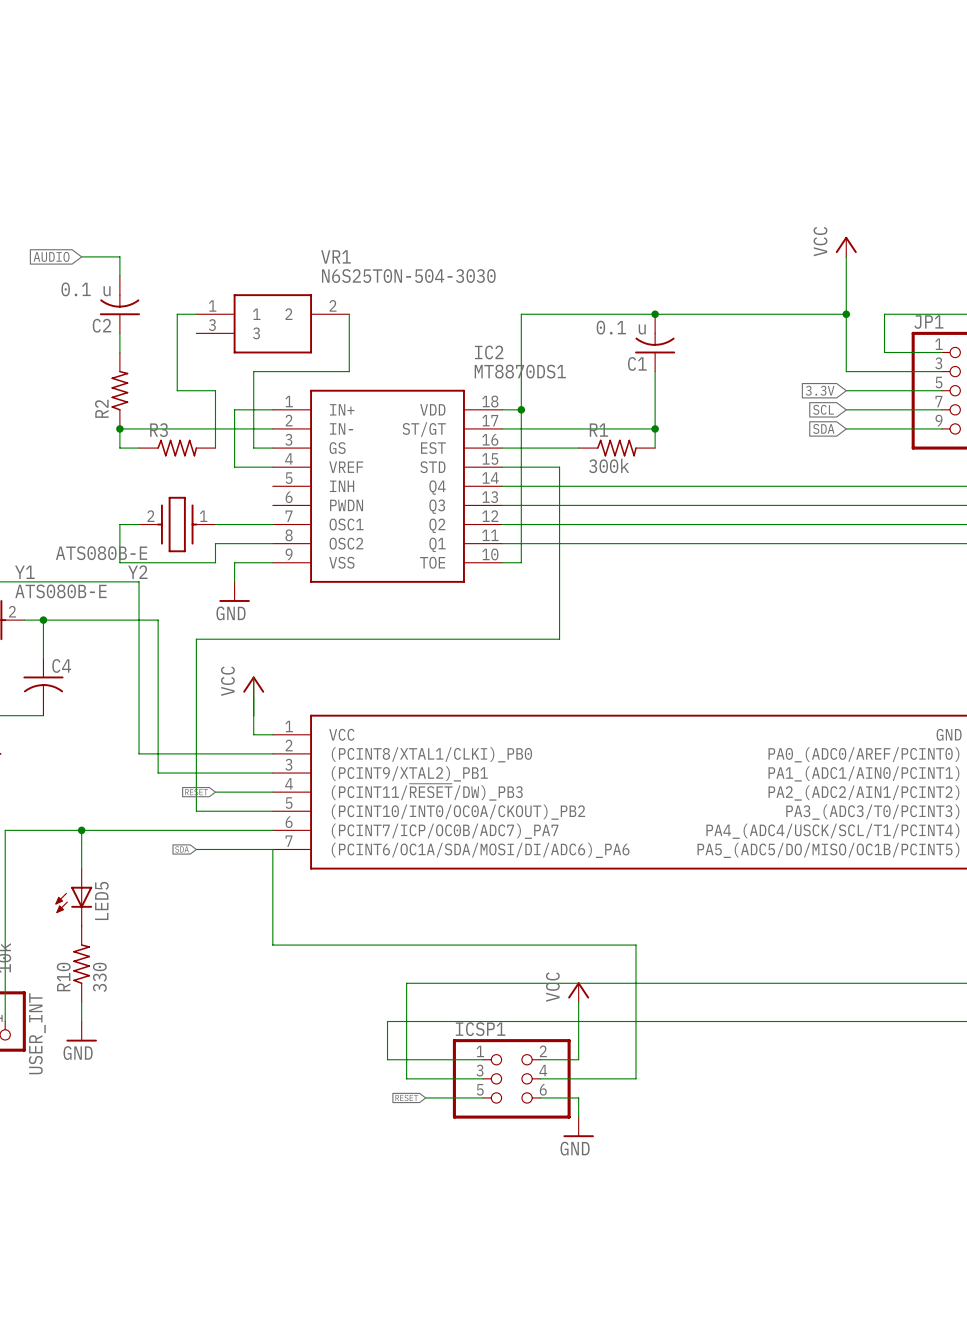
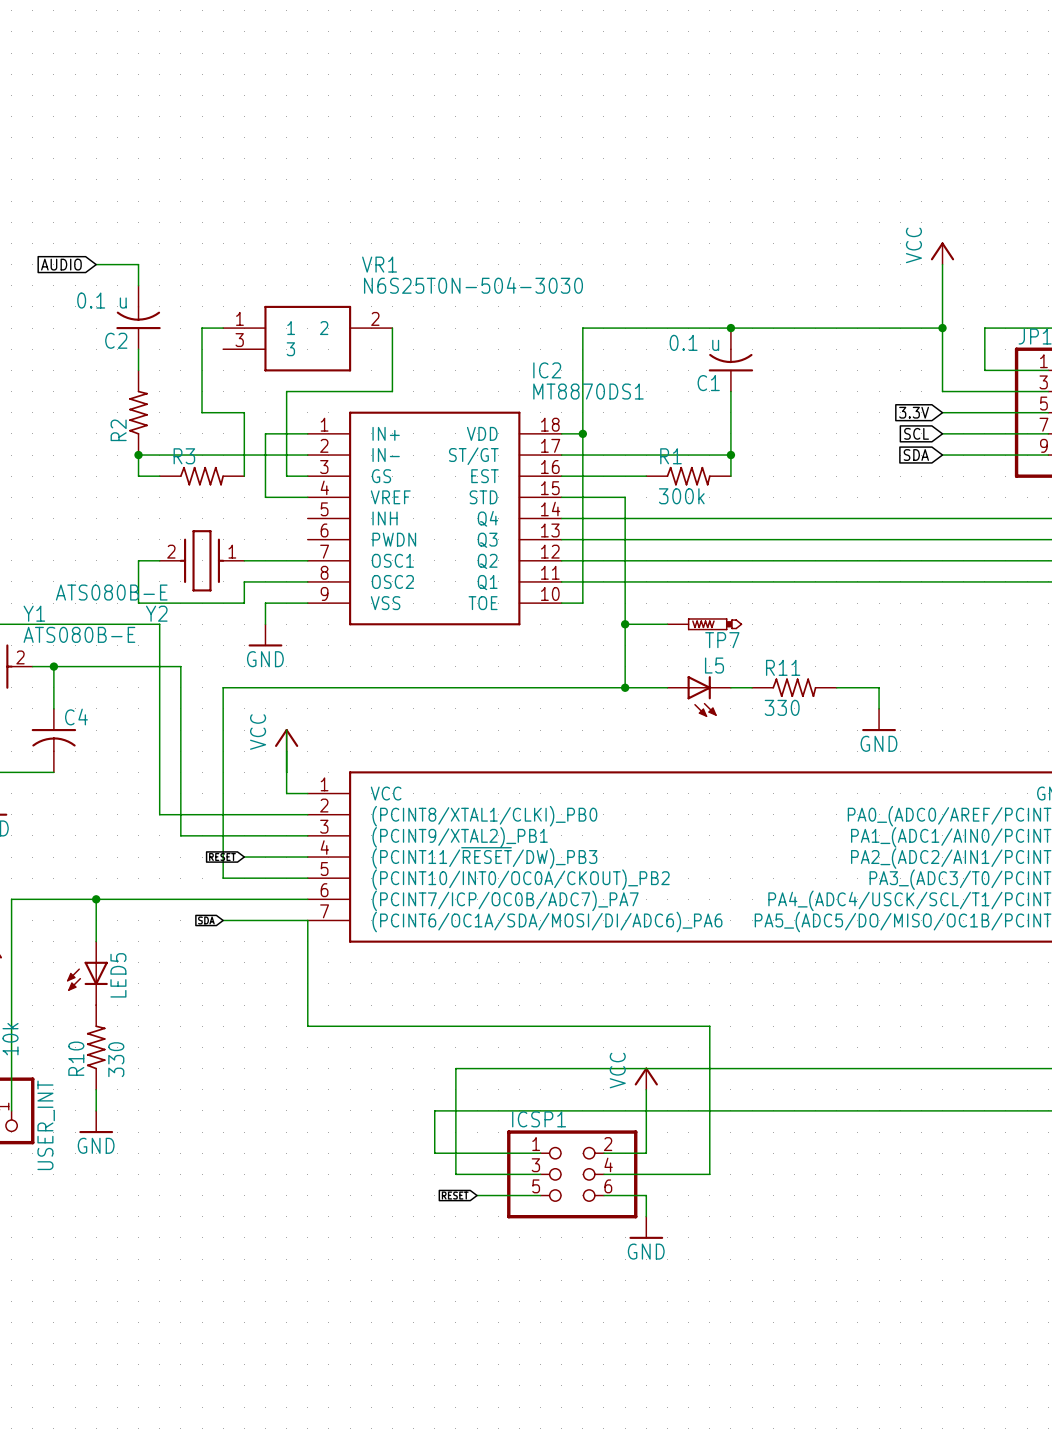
wire: none -> (625, 624) (667, 624)
junction: none -> (625, 624)
TP7: none -> (704, 624)
wire: none -> (625, 687) (667, 687)
junction: none -> (625, 687)
wire: none -> (730, 687) (752, 687)
R11: none -> 330 (794, 687)
wire: none -> (836, 687) (879, 687) (879, 708)
L5: none -> (699, 696)
power symbol: none -> GND (879, 720)

